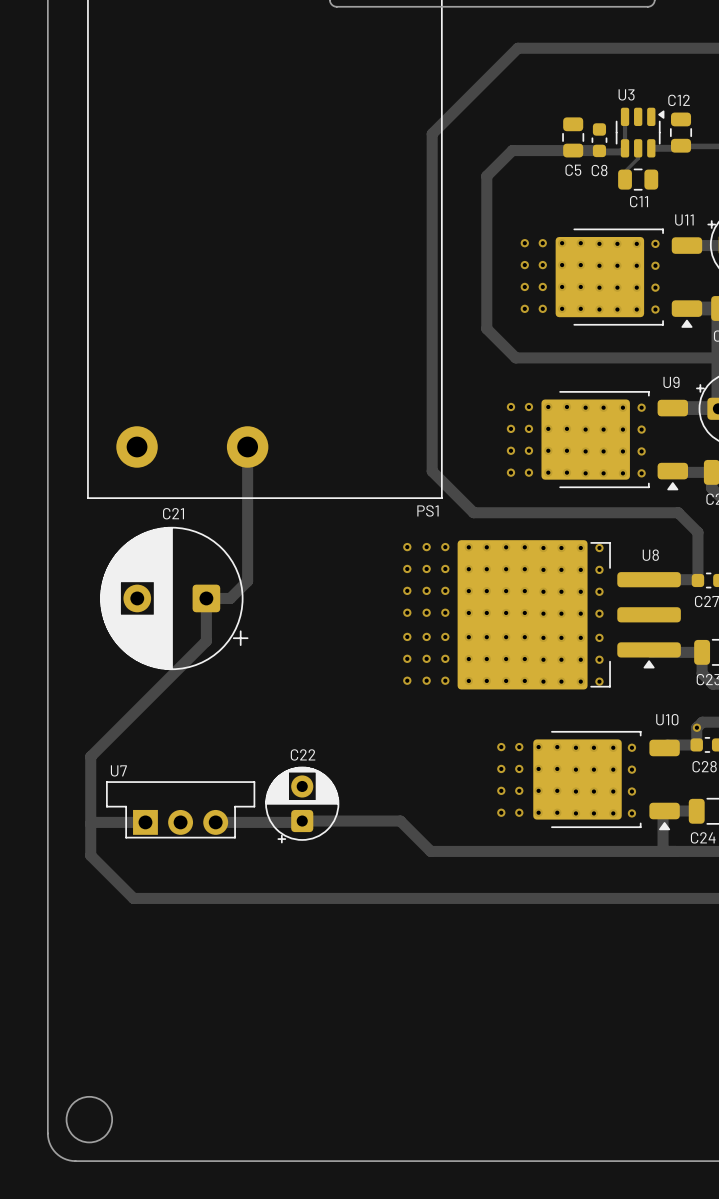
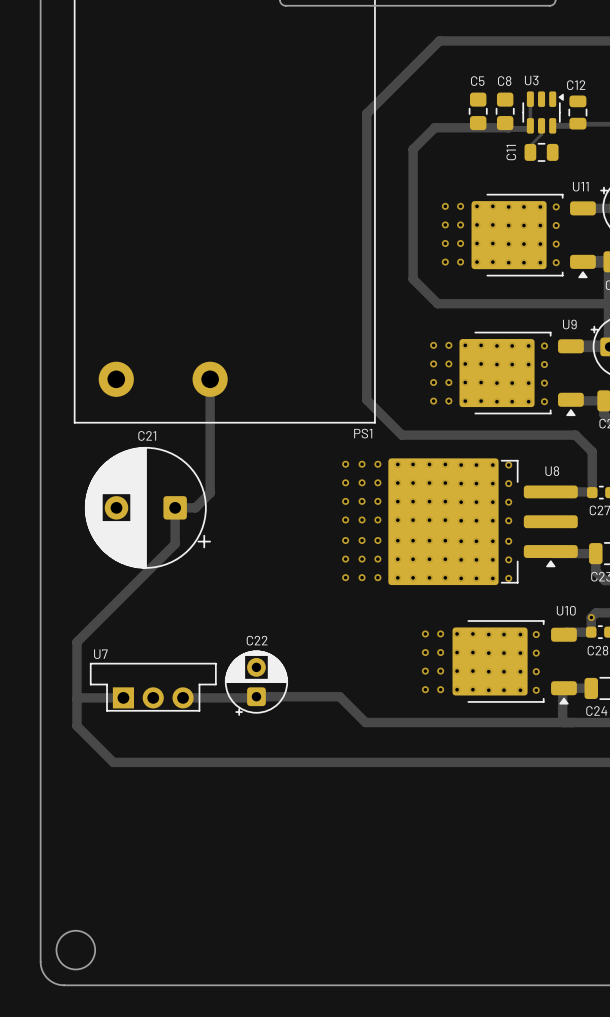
C5 footprint: [562, 117, 585, 158] -> [468, 92, 488, 131]
C8 footprint: [591, 123, 608, 158] -> [495, 92, 515, 131]
C5 name position: C5 (573, 170) -> C5 (477, 81)
C8 name position: C8 (599, 170) -> C8 (504, 81)
C11 name rotation: 0° (639, 201) -> 90° counterclockwise (511, 152)
C11 name position: C11 (639, 201) -> C11 (511, 152)

